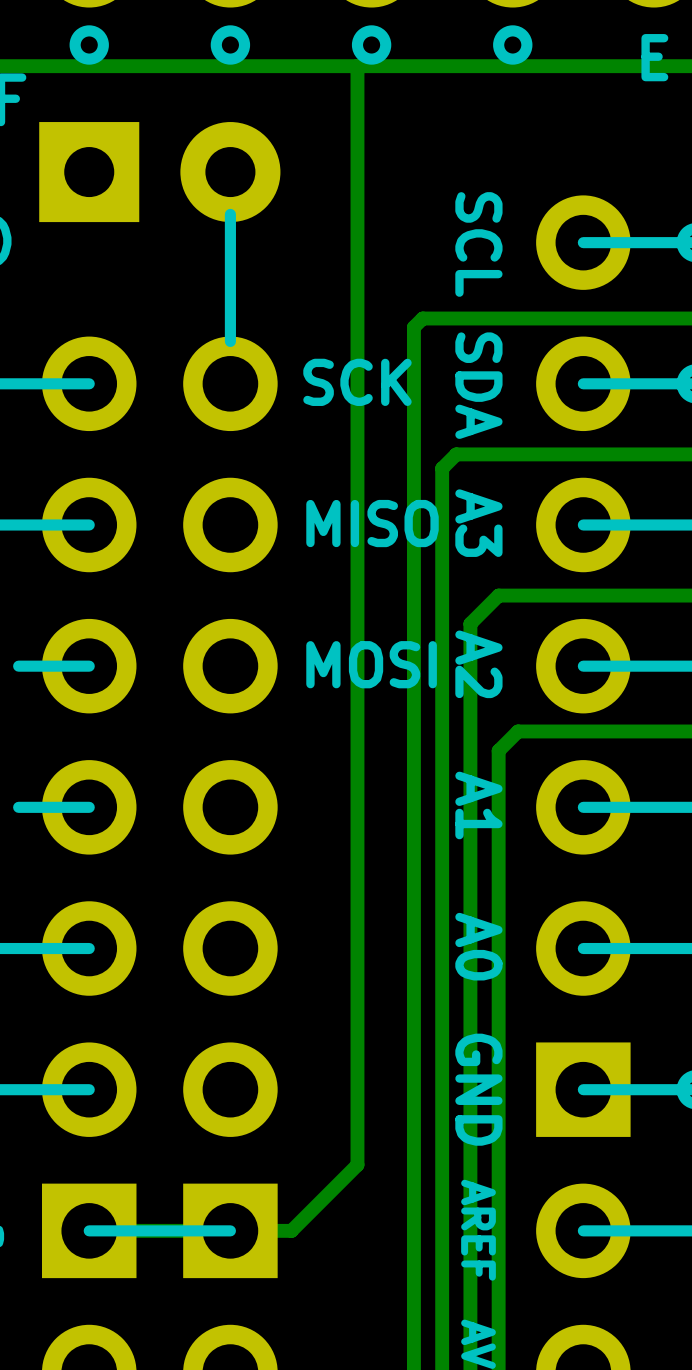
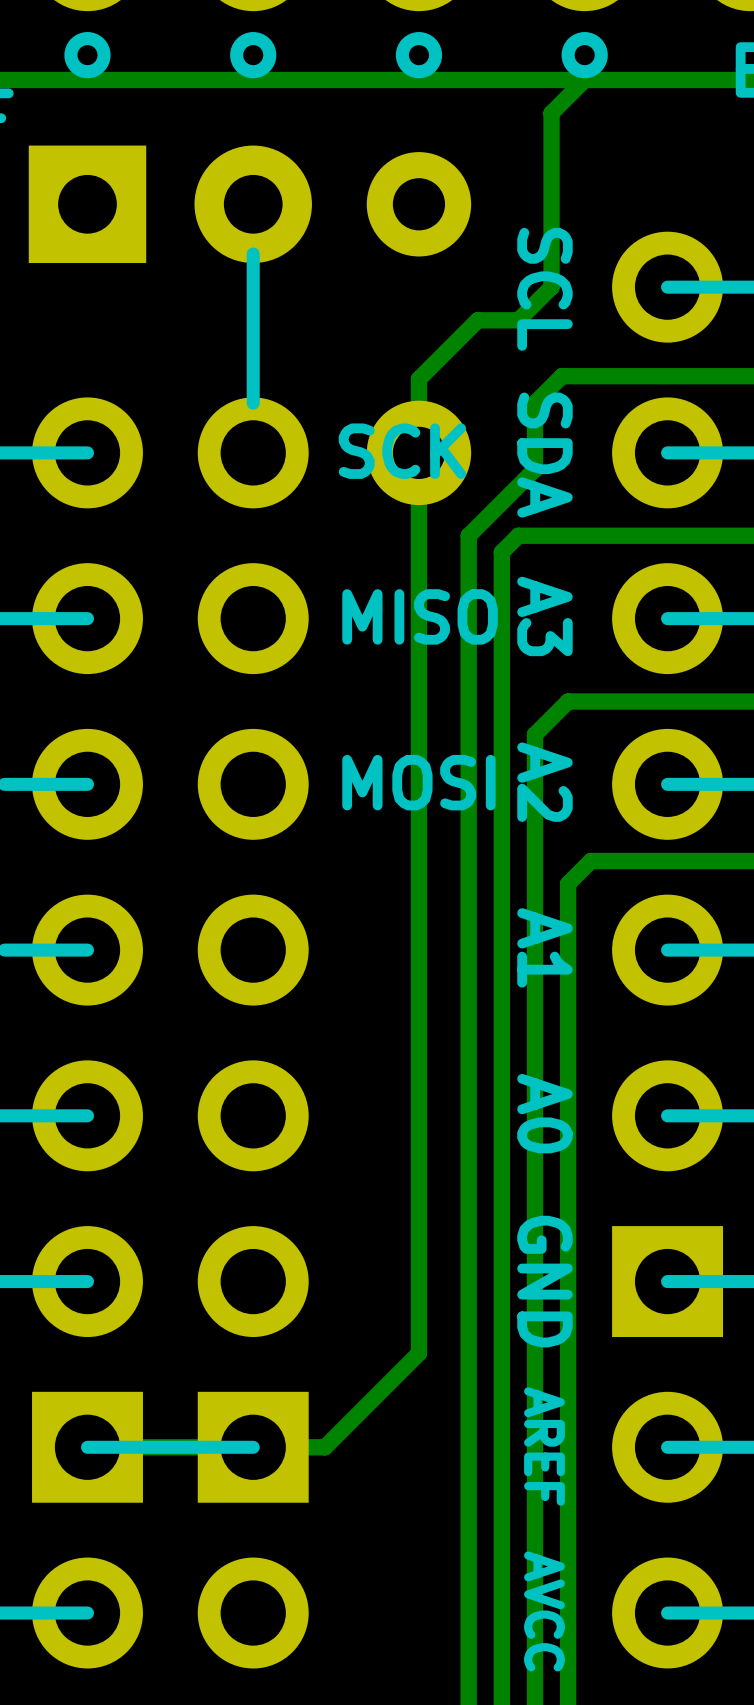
track: (357, 66) (357, 1164) -> (584, 79) (551, 113) (551, 287) (518, 320) (477, 320) (418, 379) (418, 1353) (402, 1369)
part: none -> (418, 328)
track: (493, 318) (422, 318) (413, 327) (413, 454) -> (561, 376) (534, 403) (534, 469) (468, 535)

